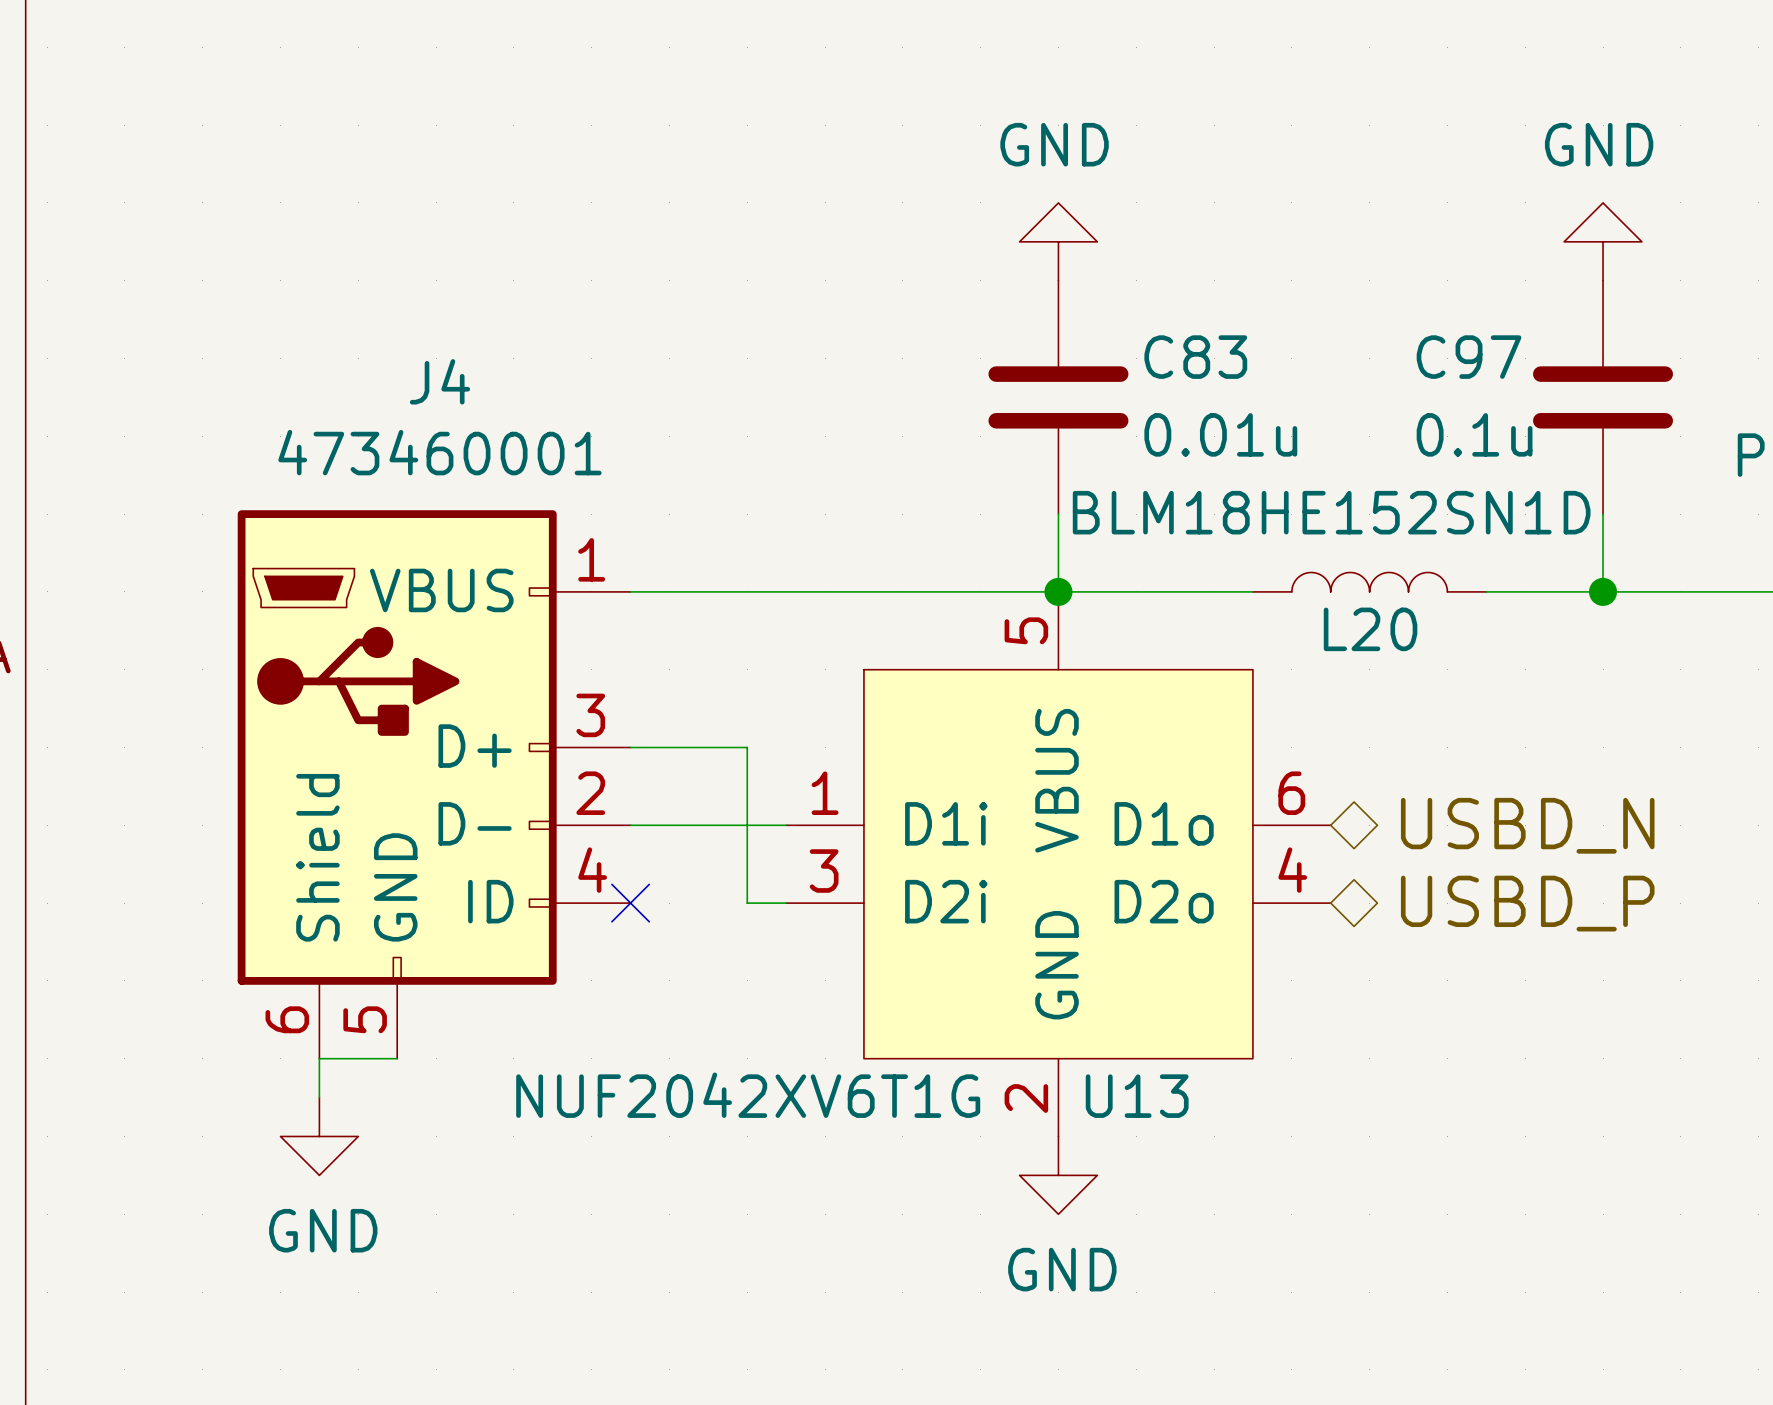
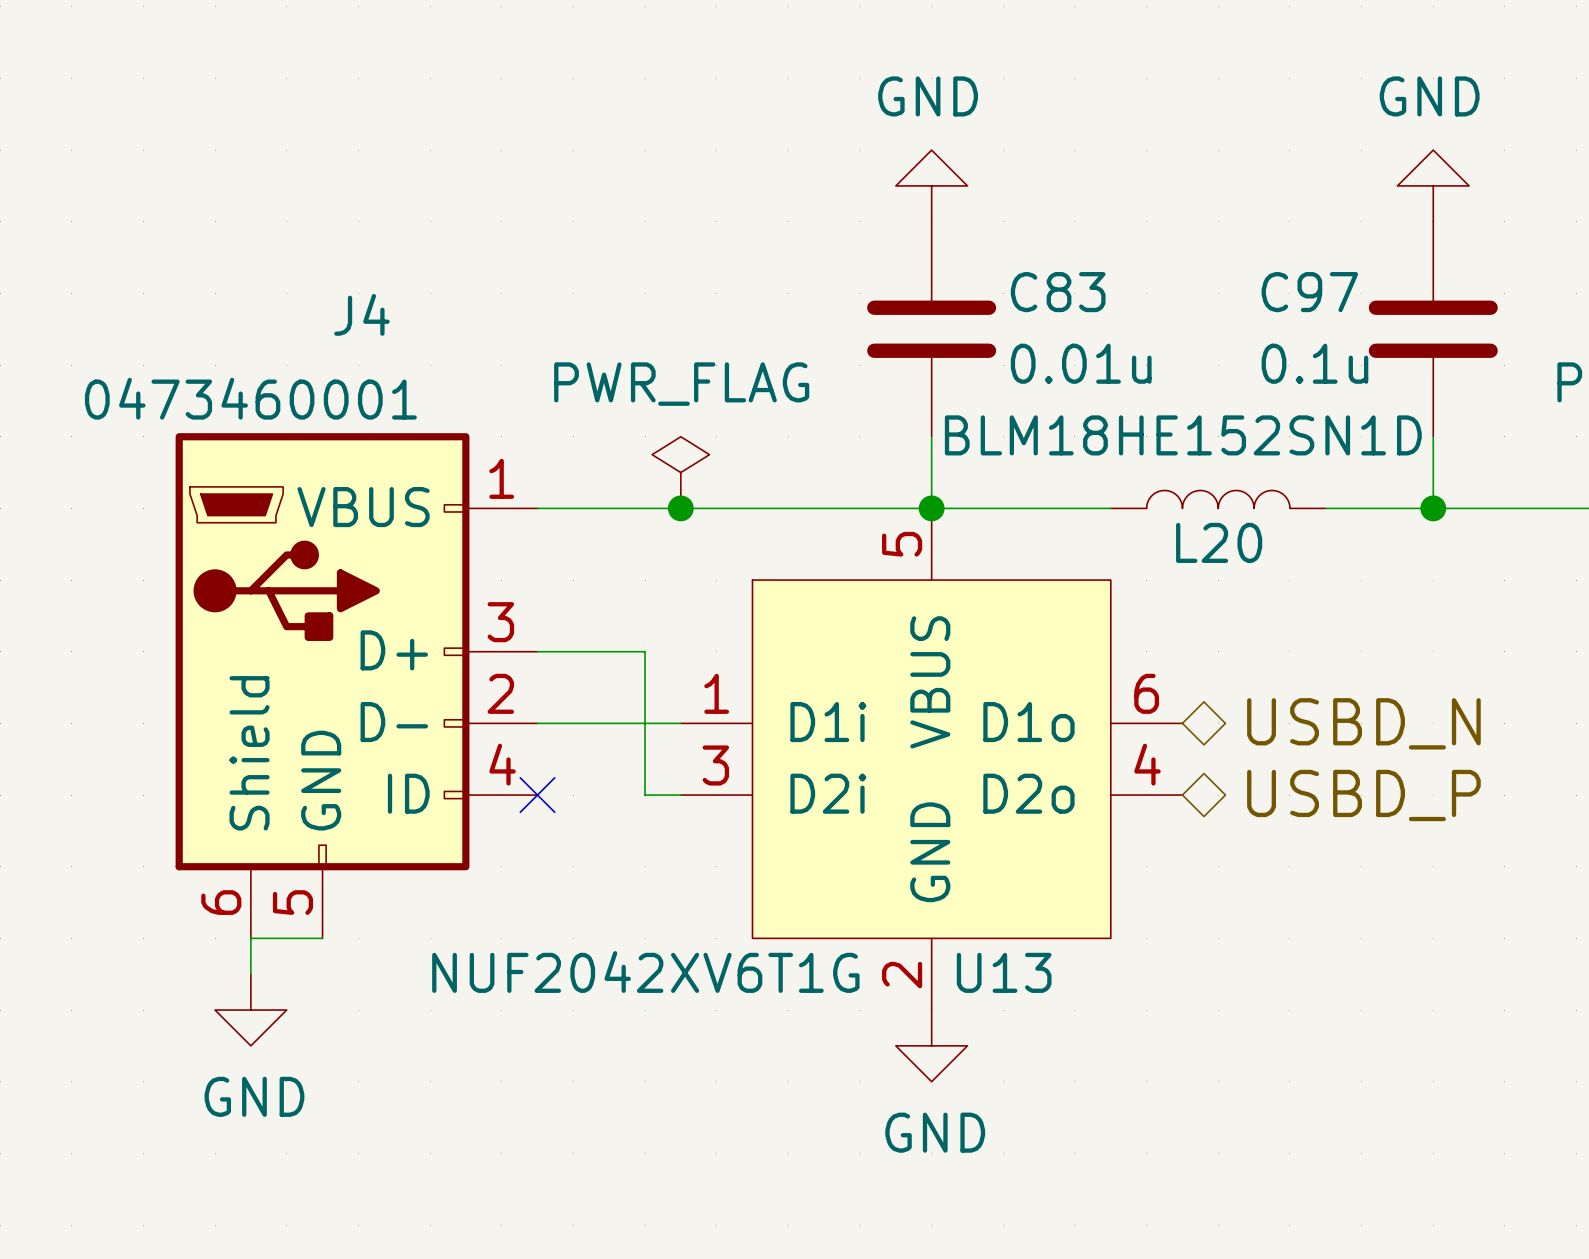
J4 value: 473460001 (439, 452) -> 0473460001 (250, 398)
power symbol: none -> PWR_FLAG (680, 472)
junction: none -> (680, 508)

